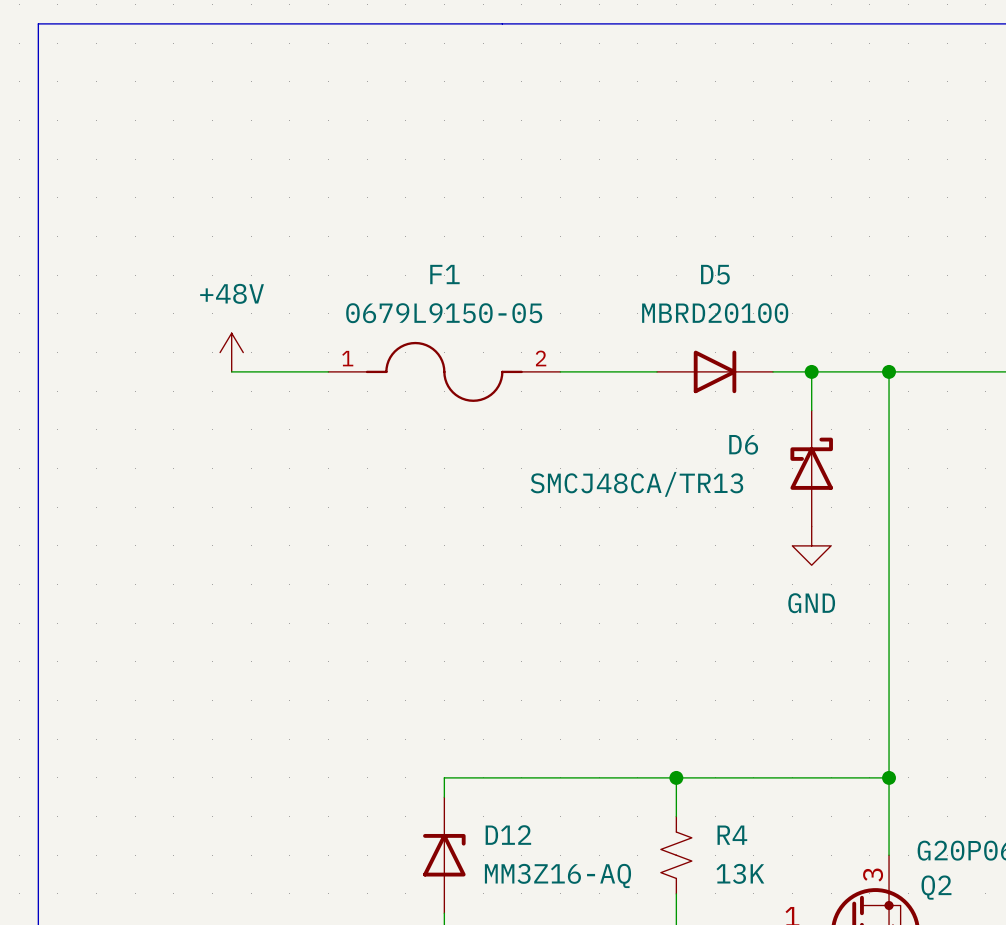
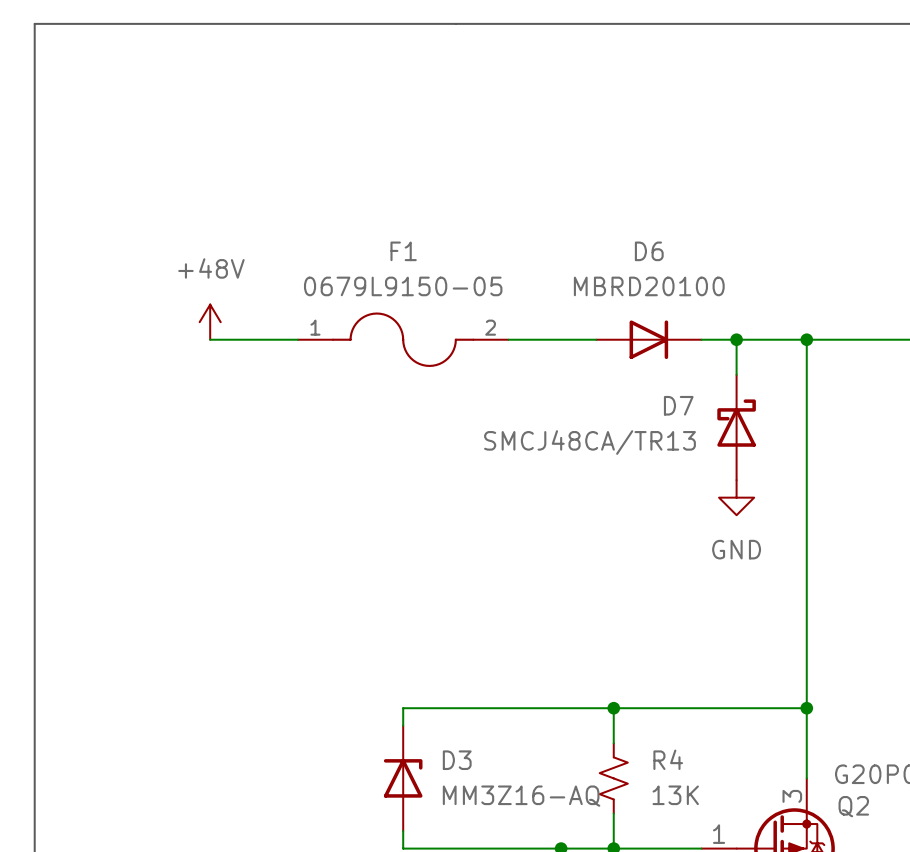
D5 name: D5 (715, 274) -> D6 (649, 251)
D6 name: D6 (743, 444) -> D7 (678, 405)
D12 name: D12 (508, 835) -> D3 (457, 760)

